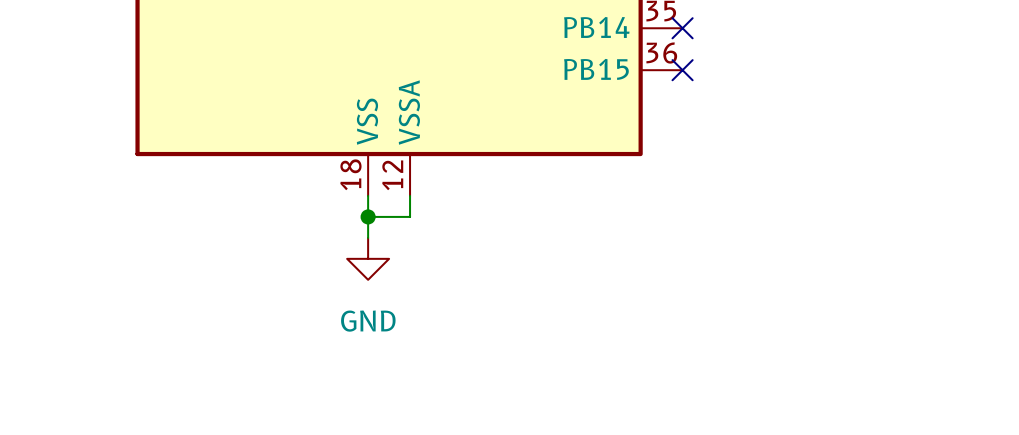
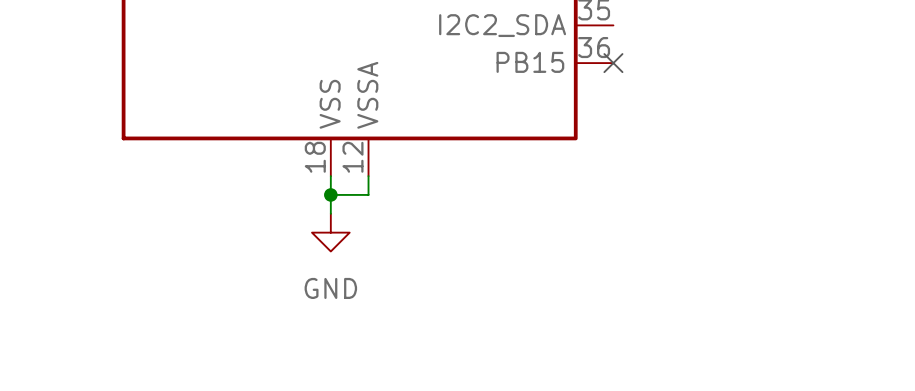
part pin name: PB14 (596, 27) -> I2C2_SDA (502, 25)
no-connect mark: (682, 28) -> none

